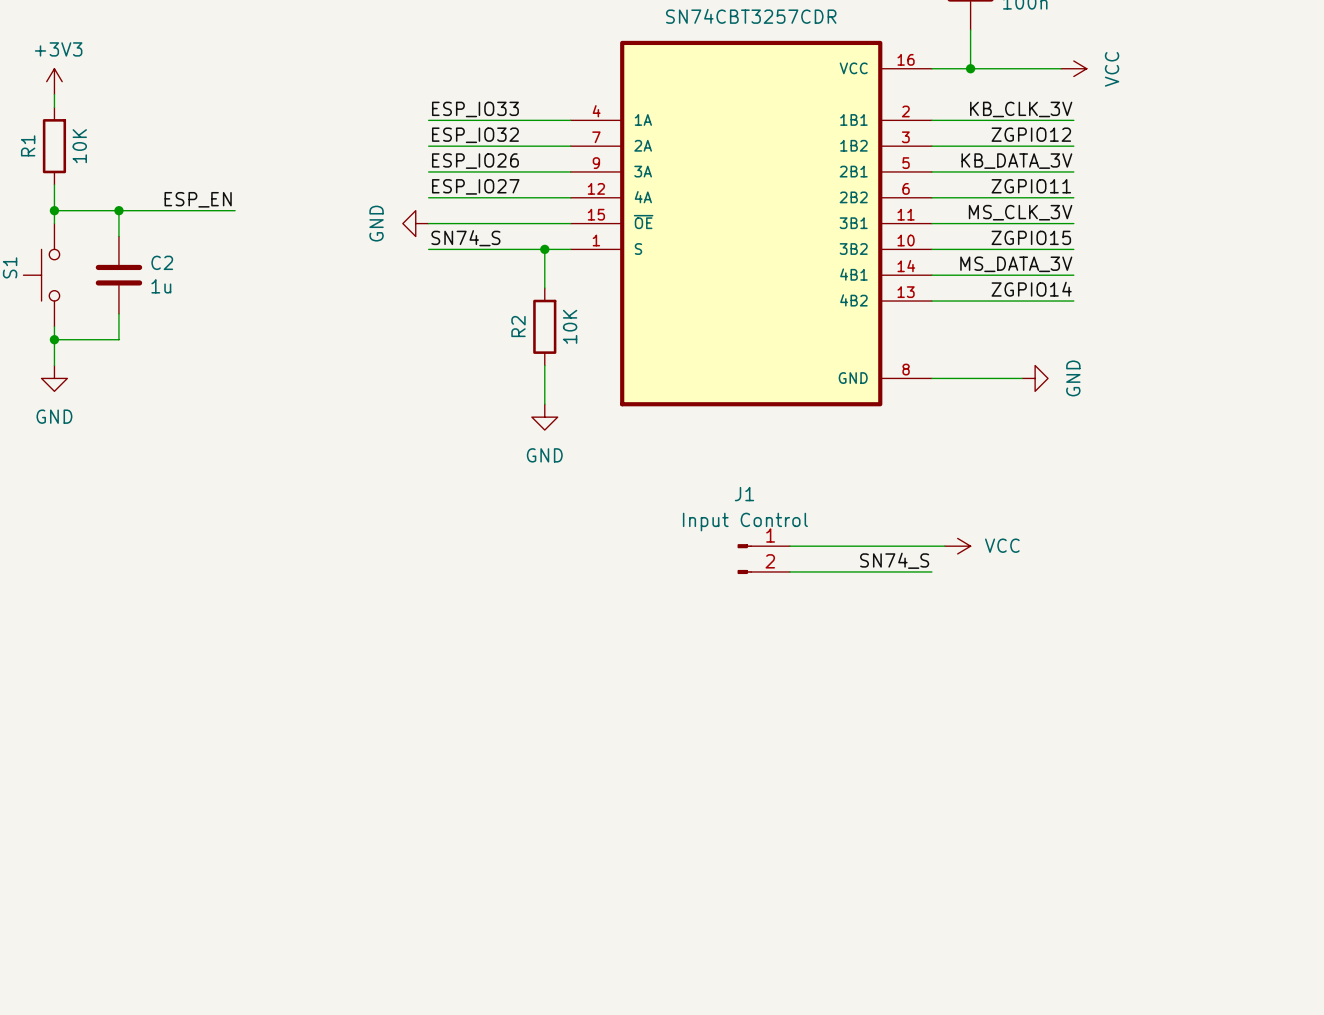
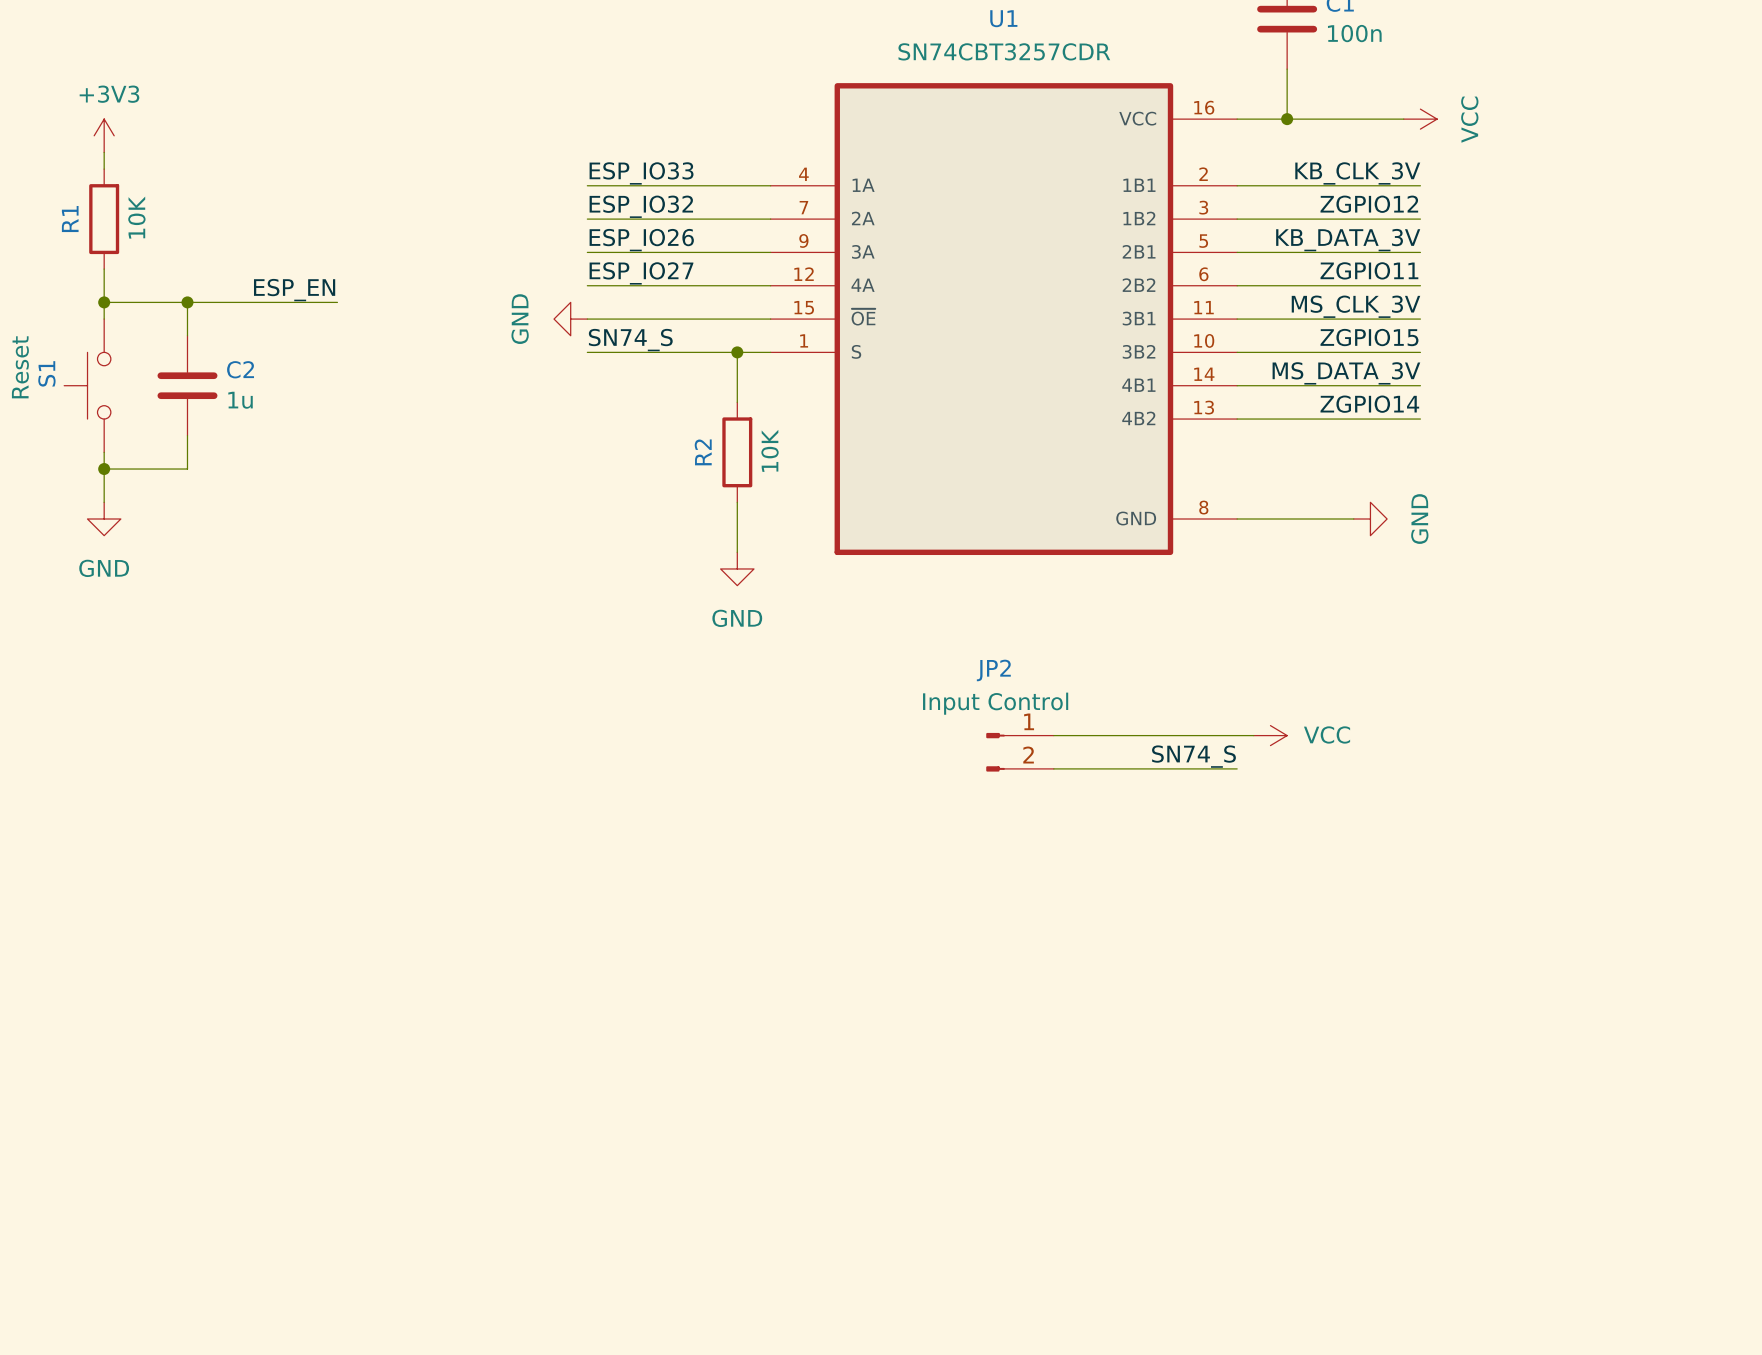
J1 name: J1 (744, 494) -> JP2 (993, 670)

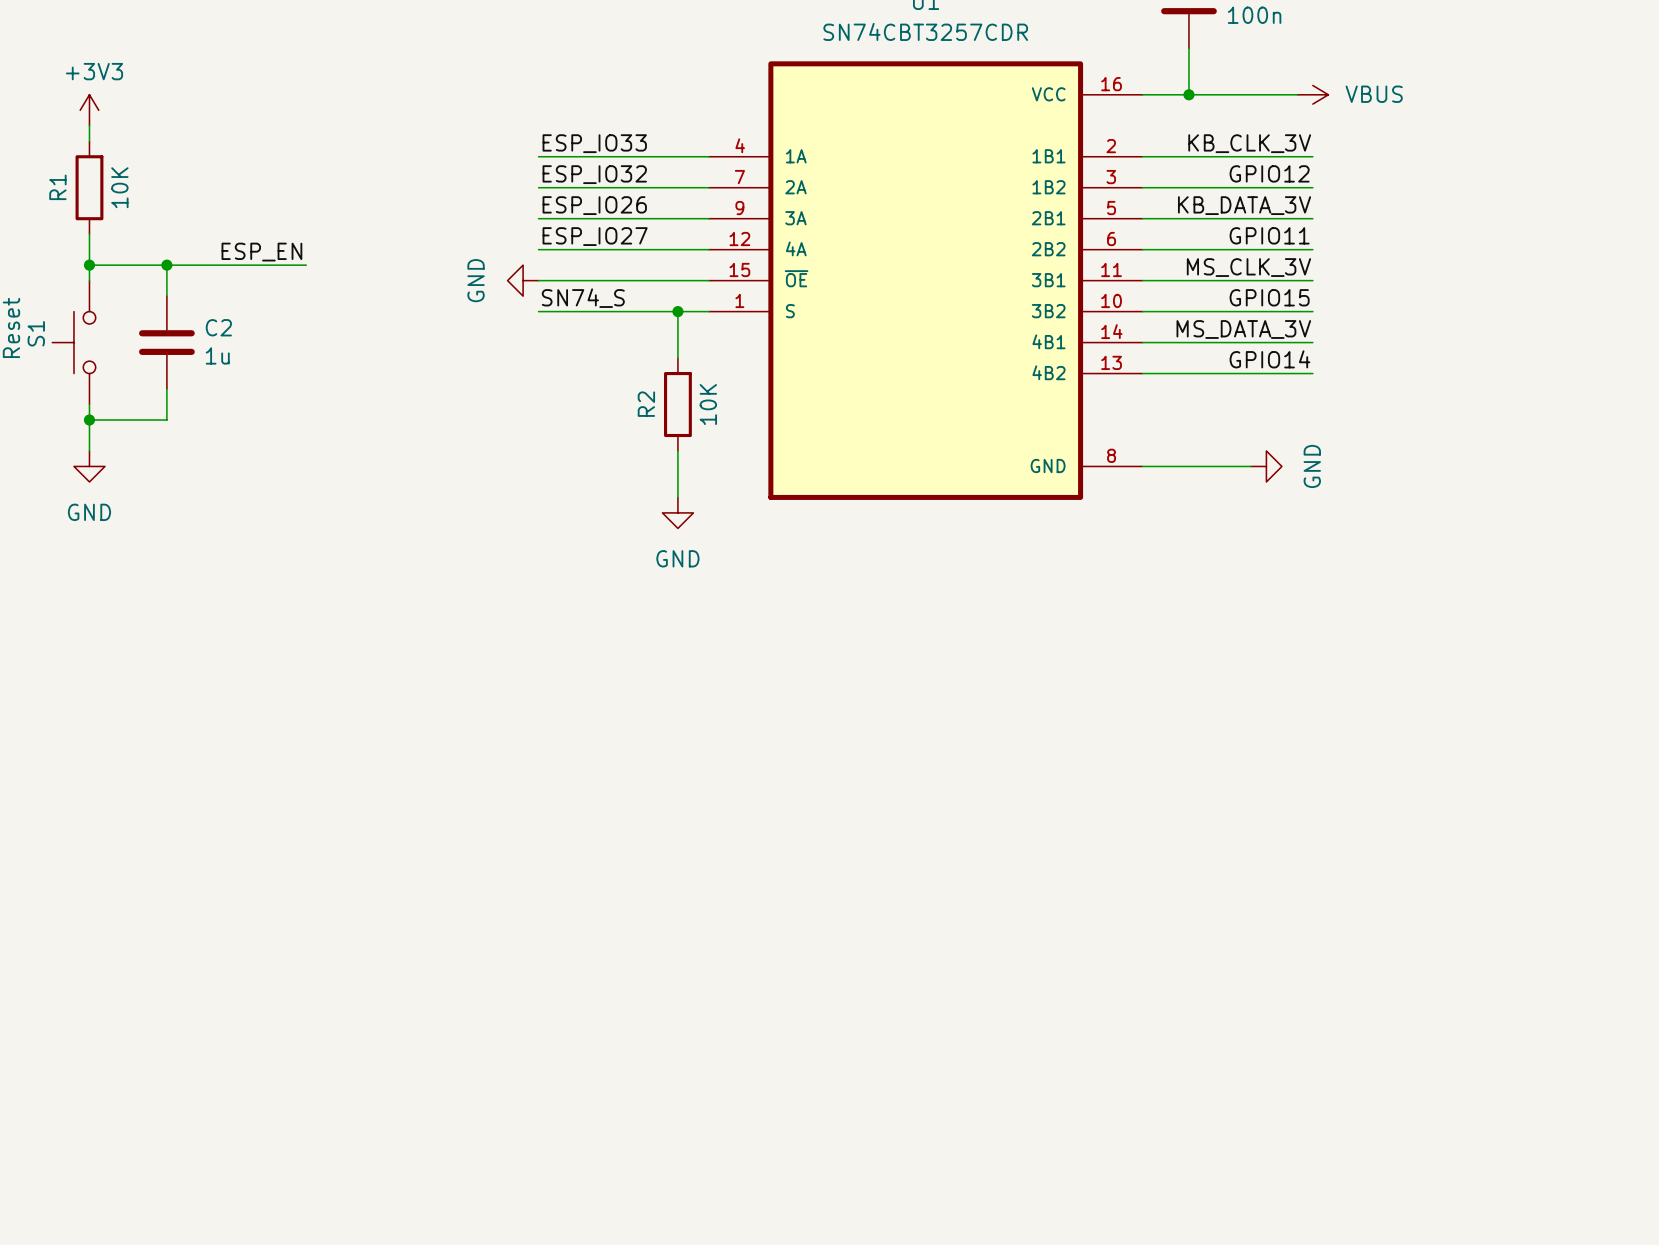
power symbol: VCC (1420, 119) -> VBUS (1312, 94)
label: ZGPIO12 (1369, 204) -> GPIO12 (1269, 173)
label: ZGPIO11 (1369, 270) -> GPIO11 (1269, 235)
label: ZGPIO15 (1369, 337) -> GPIO15 (1269, 297)
label: ZGPIO14 (1369, 404) -> GPIO14 (1269, 359)
wire: (1053, 735) (1253, 735) -> none
power symbol: VCC (1270, 735) -> none
JP2: Input Control (1020, 752) -> none
label: SN74_S (1193, 756) -> none
wire: (1053, 768) (1237, 768) -> none

